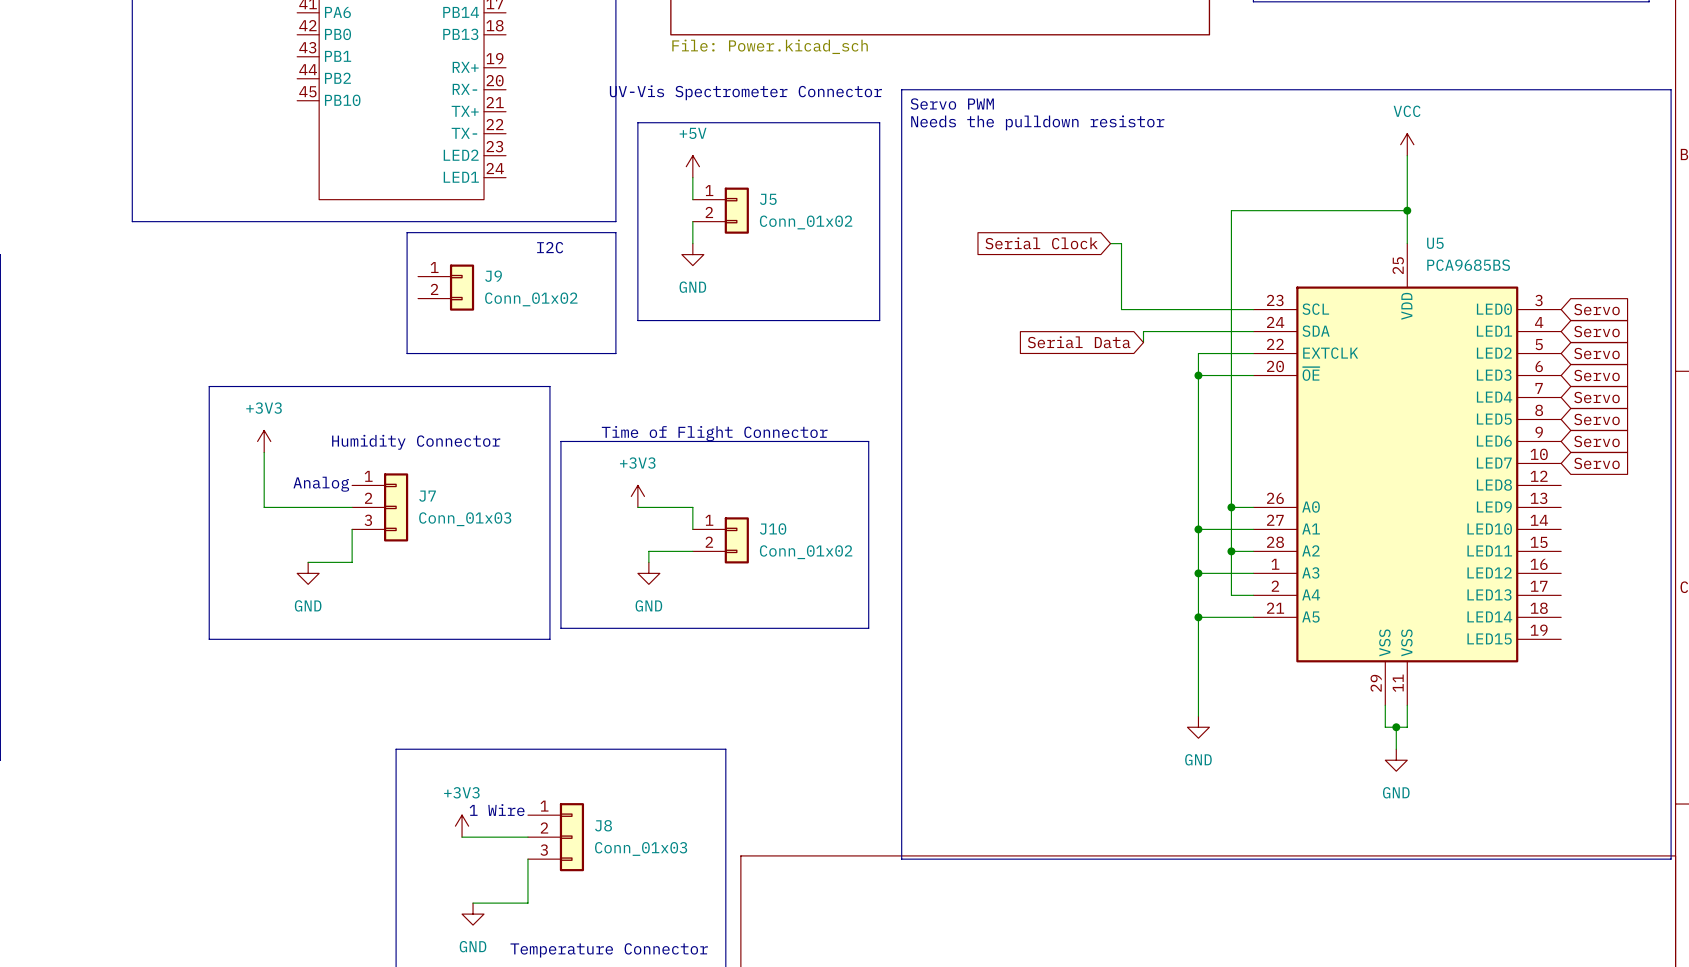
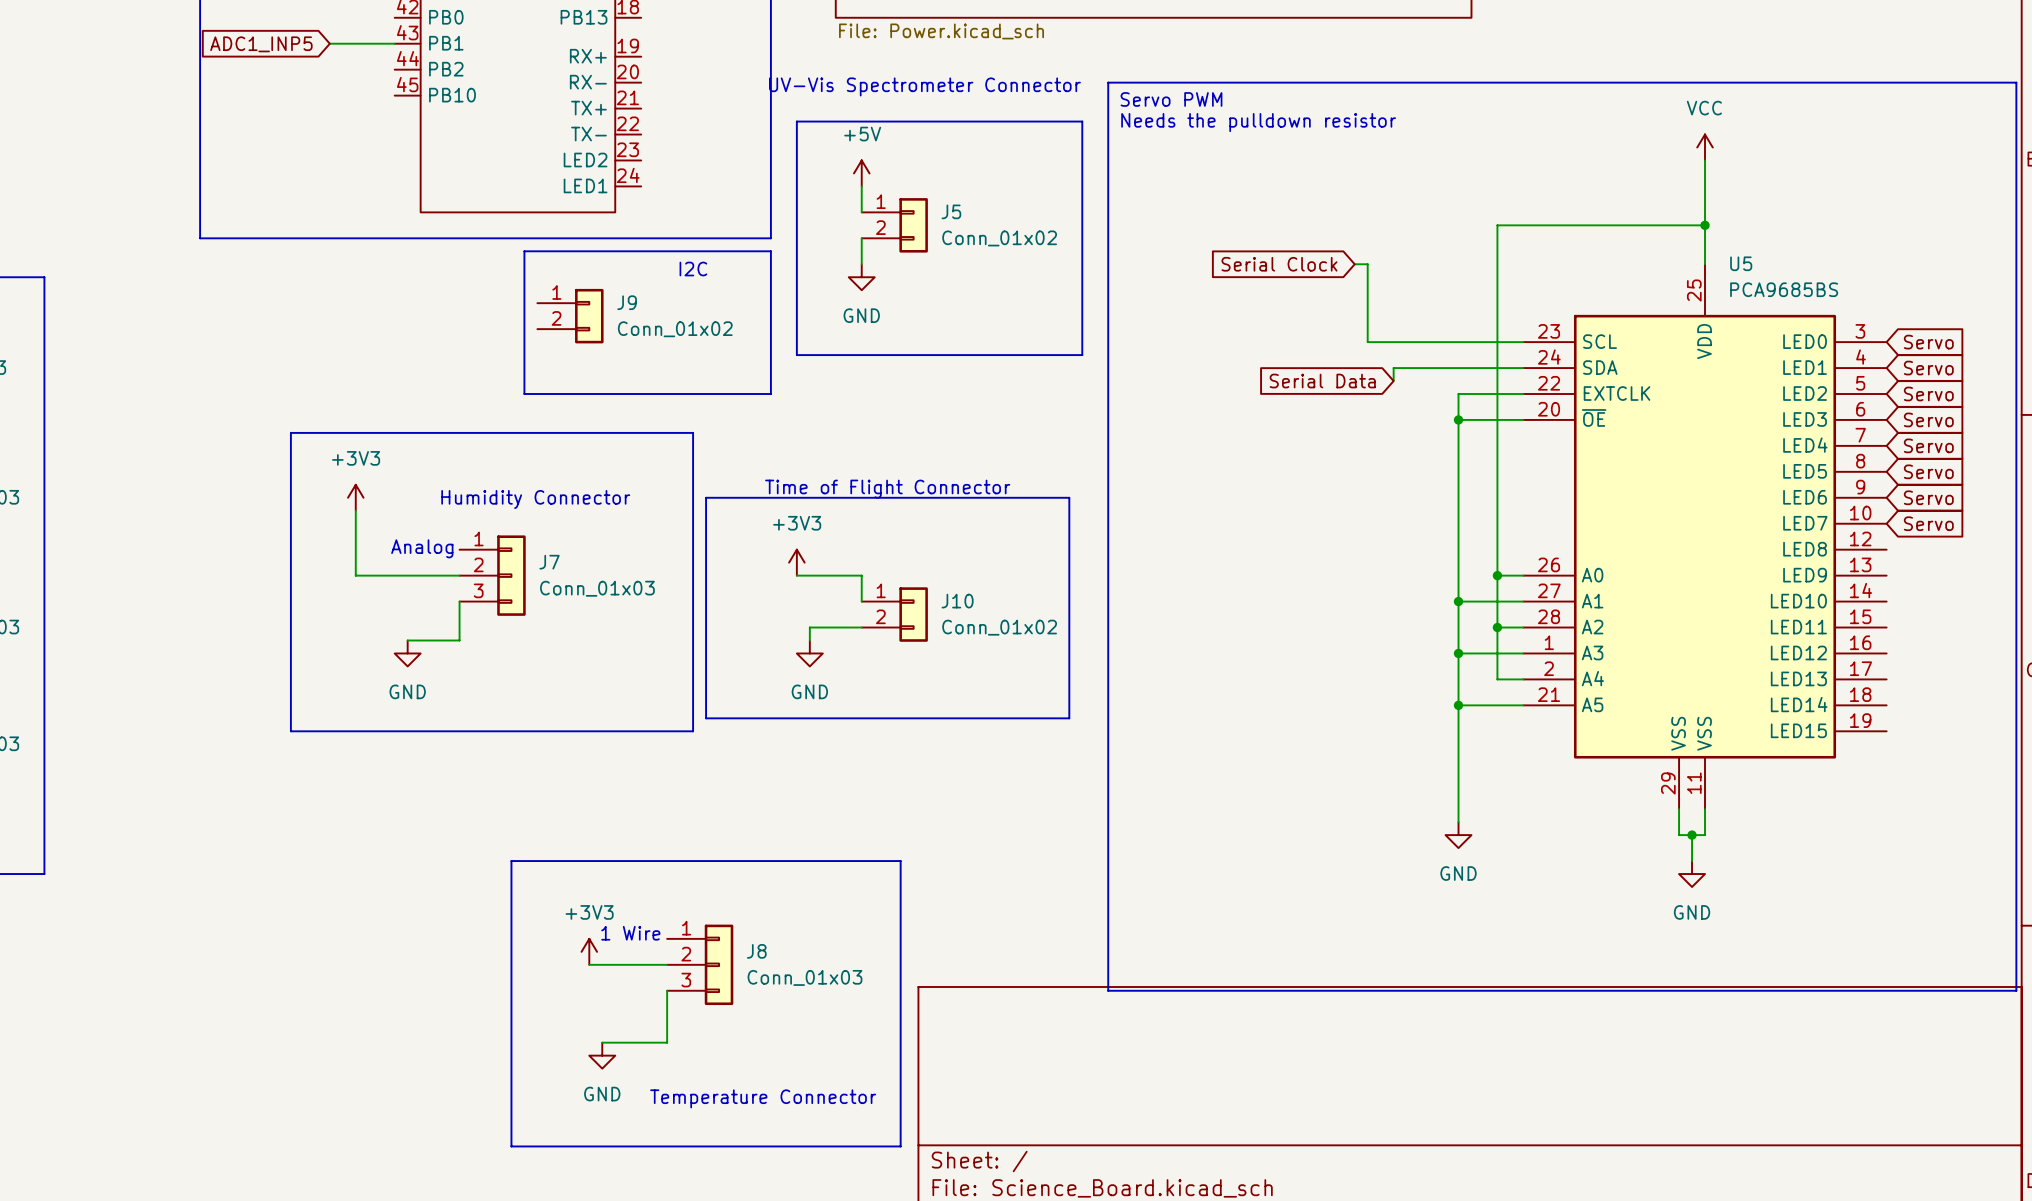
wire: none -> (329, 43) (394, 43)
global label: none -> ADC1_INP5 (261, 44)

